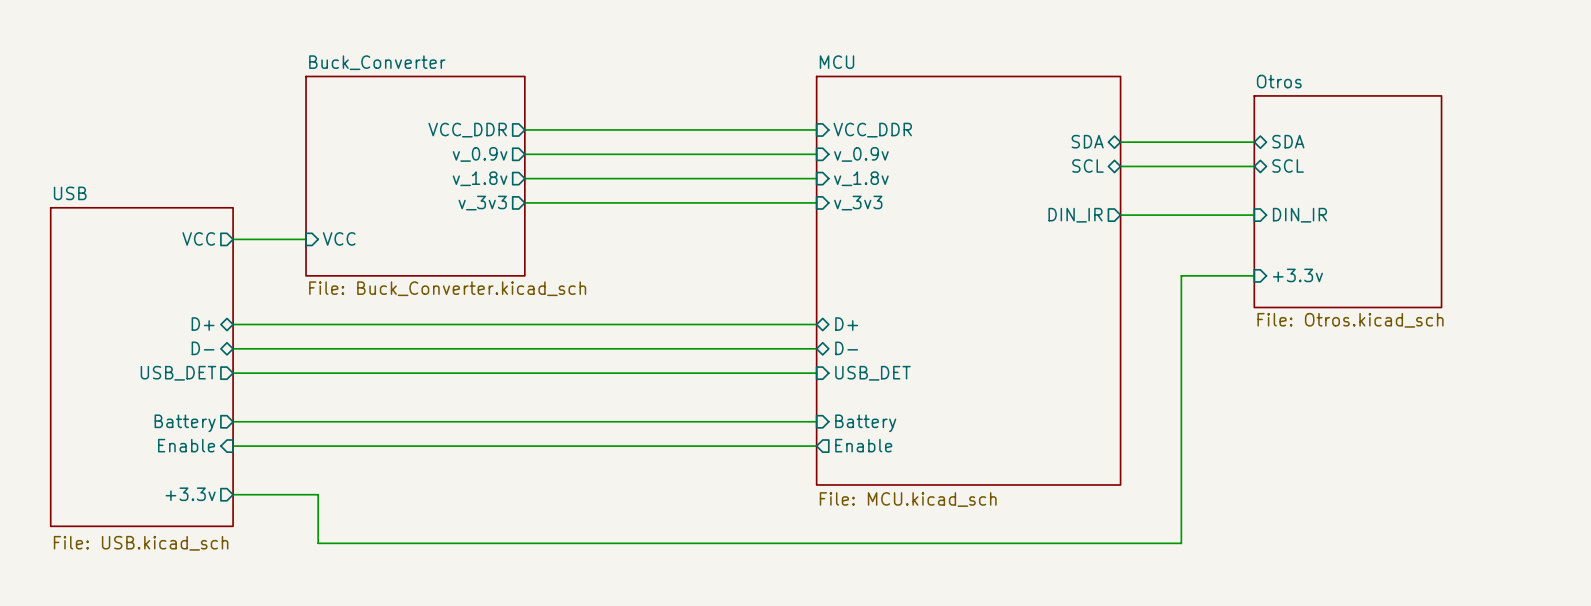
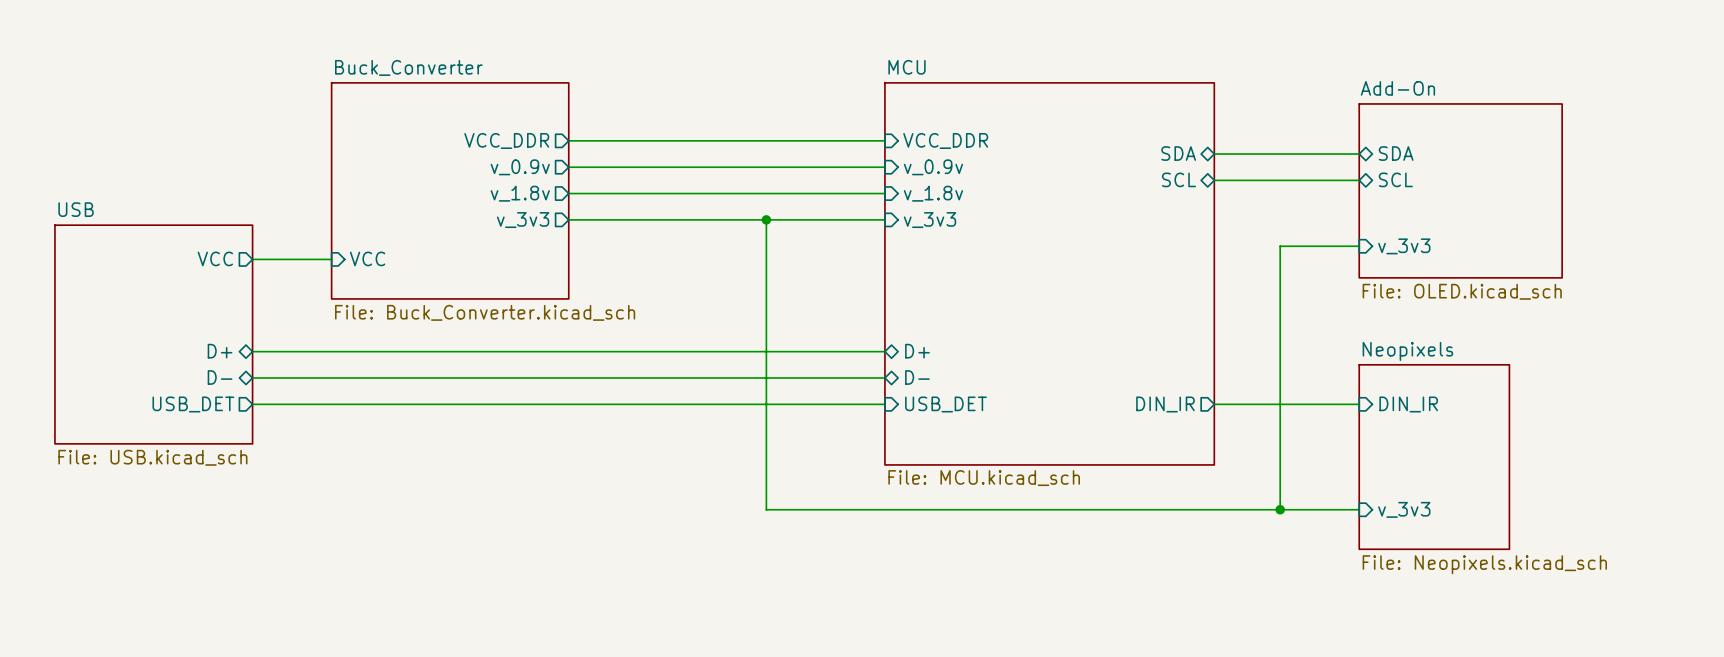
sheet Add-On: none -> File: OLED.kicad_sch (1460, 190)
sheet Otros: File: Otros.kicad_sch (1347, 201) -> none
wire: none -> (766, 219) (766, 509) (1359, 509)
junction: none -> (766, 219)
sheet pin: DIN_IR (1075, 215) -> none
wire: (1120, 215) (1254, 215) -> (1214, 404) (1359, 404)
sheet pin: DIN_IR (1299, 215) -> none
sheet pin: none -> v_3v3 (1404, 246)
sheet MCU: none -> File: MCU.kicad_sch (1049, 273)
wire: (1181, 275) (1254, 275) -> (1280, 298) (1280, 246) (1359, 246)
sheet pin: +3.3v (1297, 275) -> none
sheet MCU: File: MCU.kicad_sch (968, 280) -> none
sheet USB: none -> File: USB.kicad_sch (153, 334)
sheet USB: File: USB.kicad_sch (141, 367) -> none
sheet pin: none -> DIN_IR (1165, 404)
sheet pin: none -> DIN_IR (1408, 404)
wire: (233, 421) (816, 421) -> none
sheet Neopixels: none -> File: Neopixels.kicad_sch (1434, 457)
sheet pin: Battery (185, 423) -> none
sheet pin: Battery (865, 423) -> none
sheet pin: Enable (186, 445) -> none
sheet pin: Enable (863, 445) -> none
wire: (233, 446) (816, 446) -> none
wire: (1181, 470) (1181, 543) (318, 543) (318, 494) (233, 494) -> none
junction: none -> (1280, 509)
sheet pin: none -> v_3v3 (1404, 509)
sheet pin: +3.3v (190, 494) -> none

